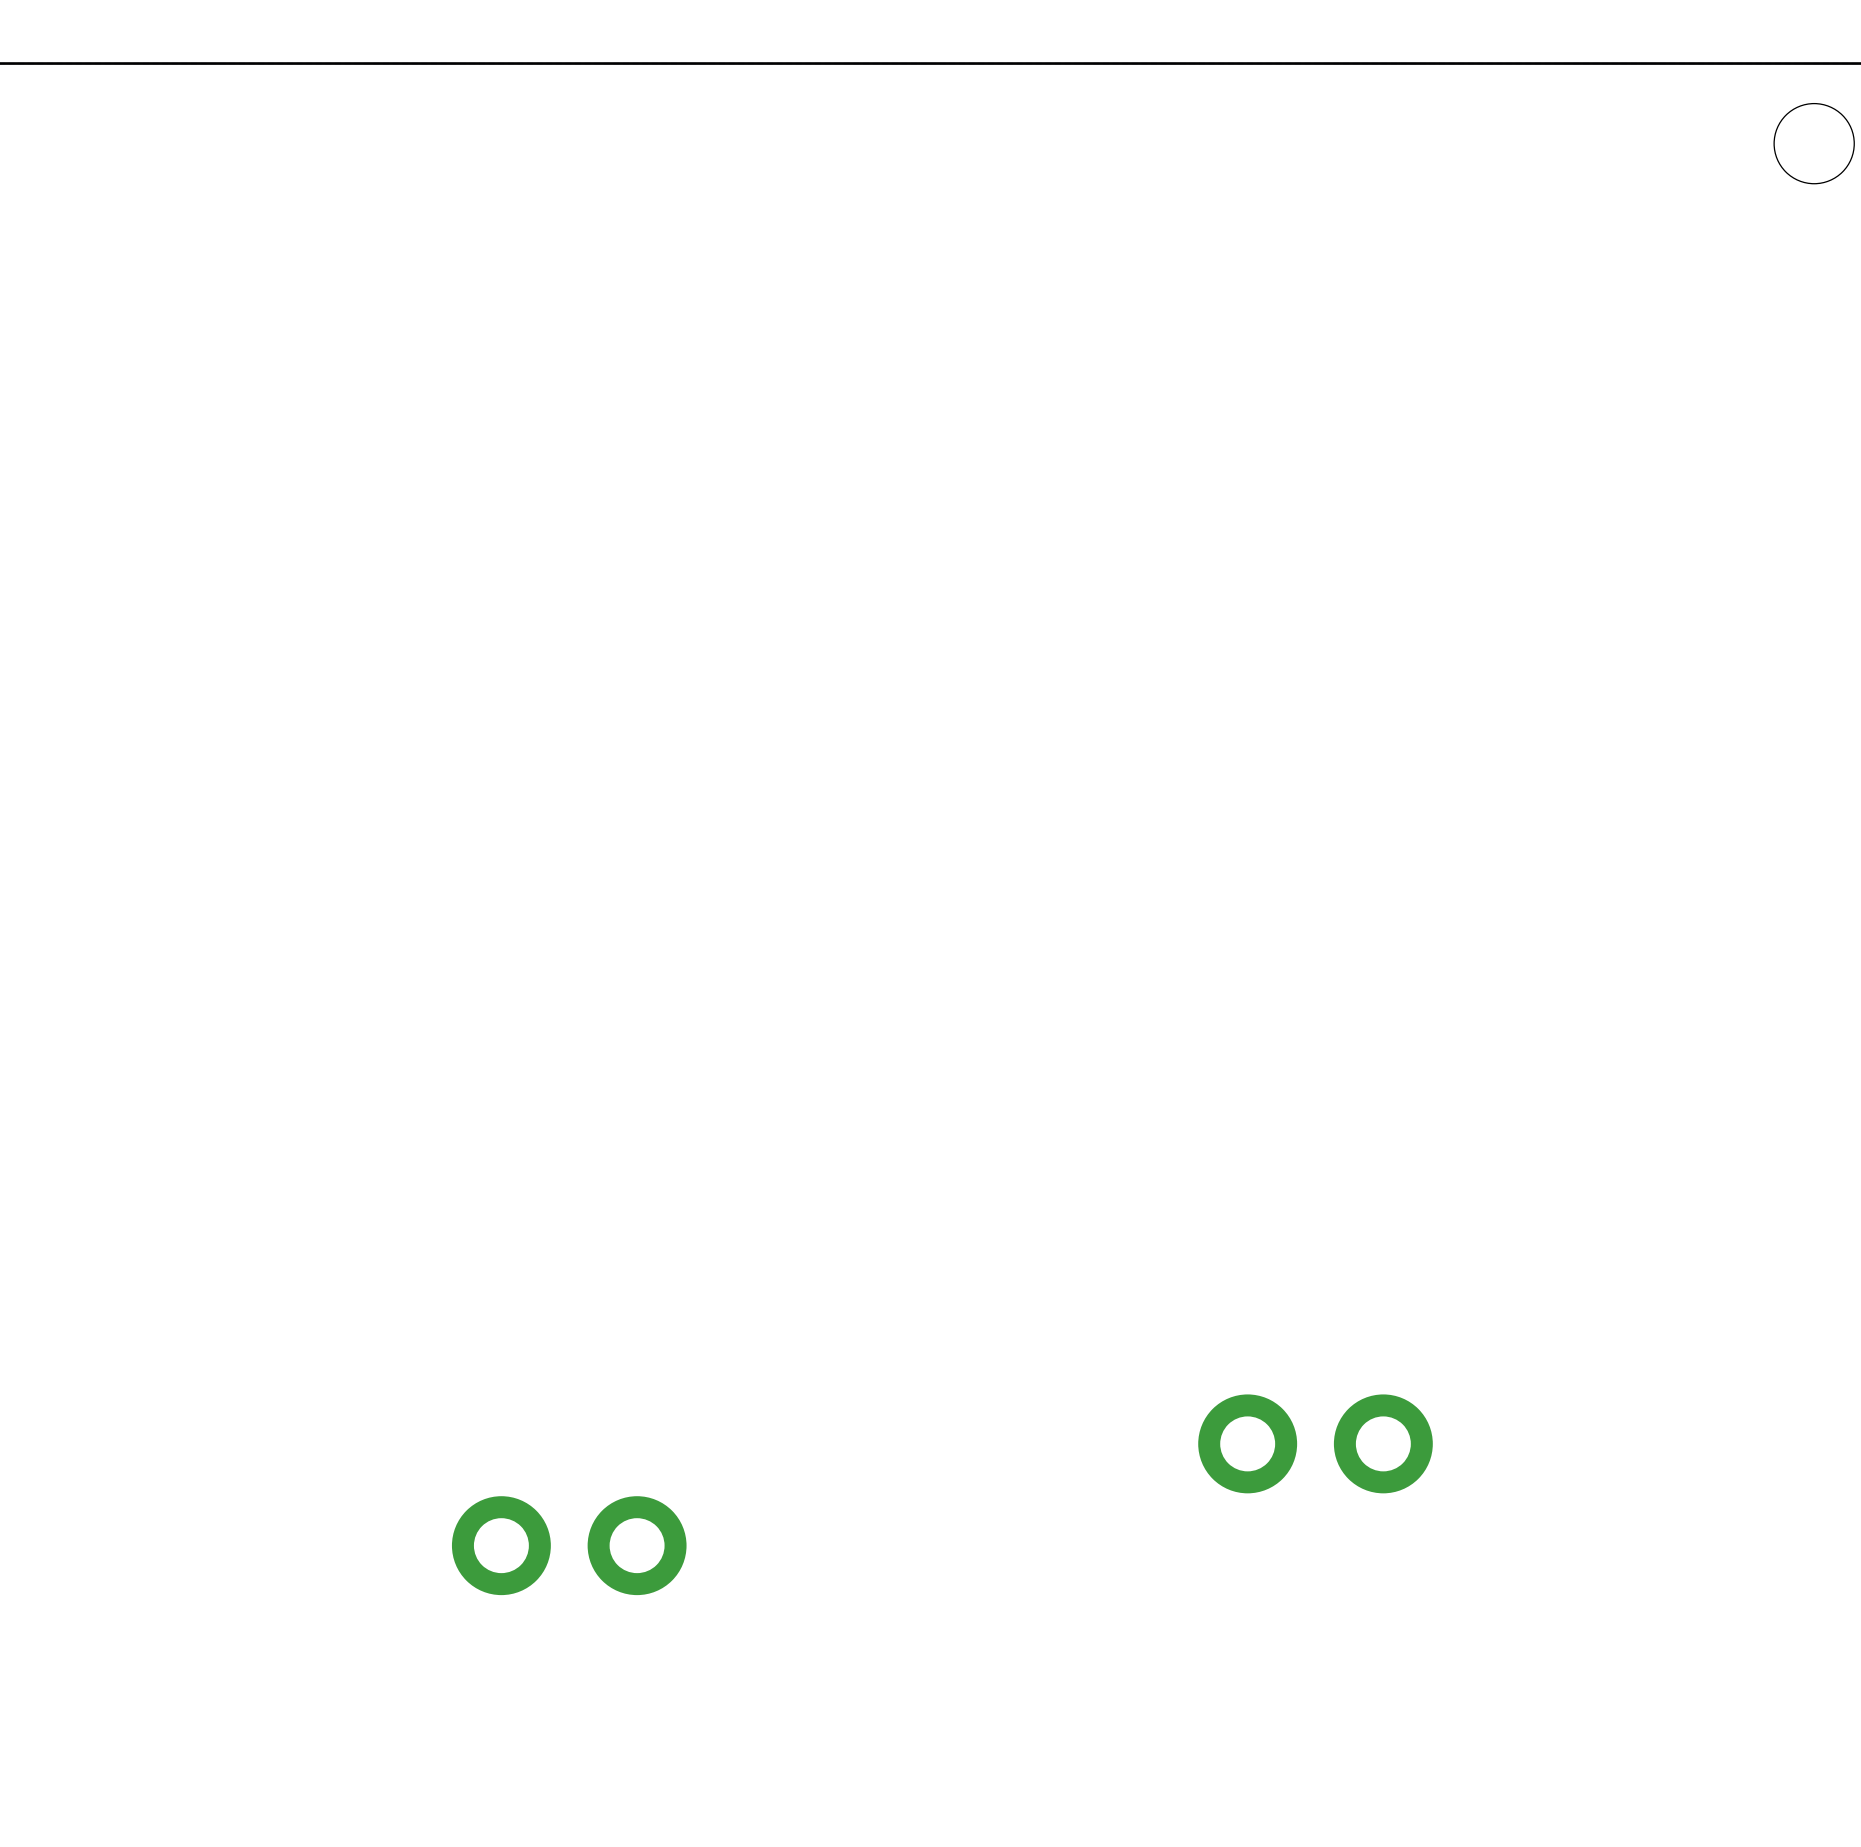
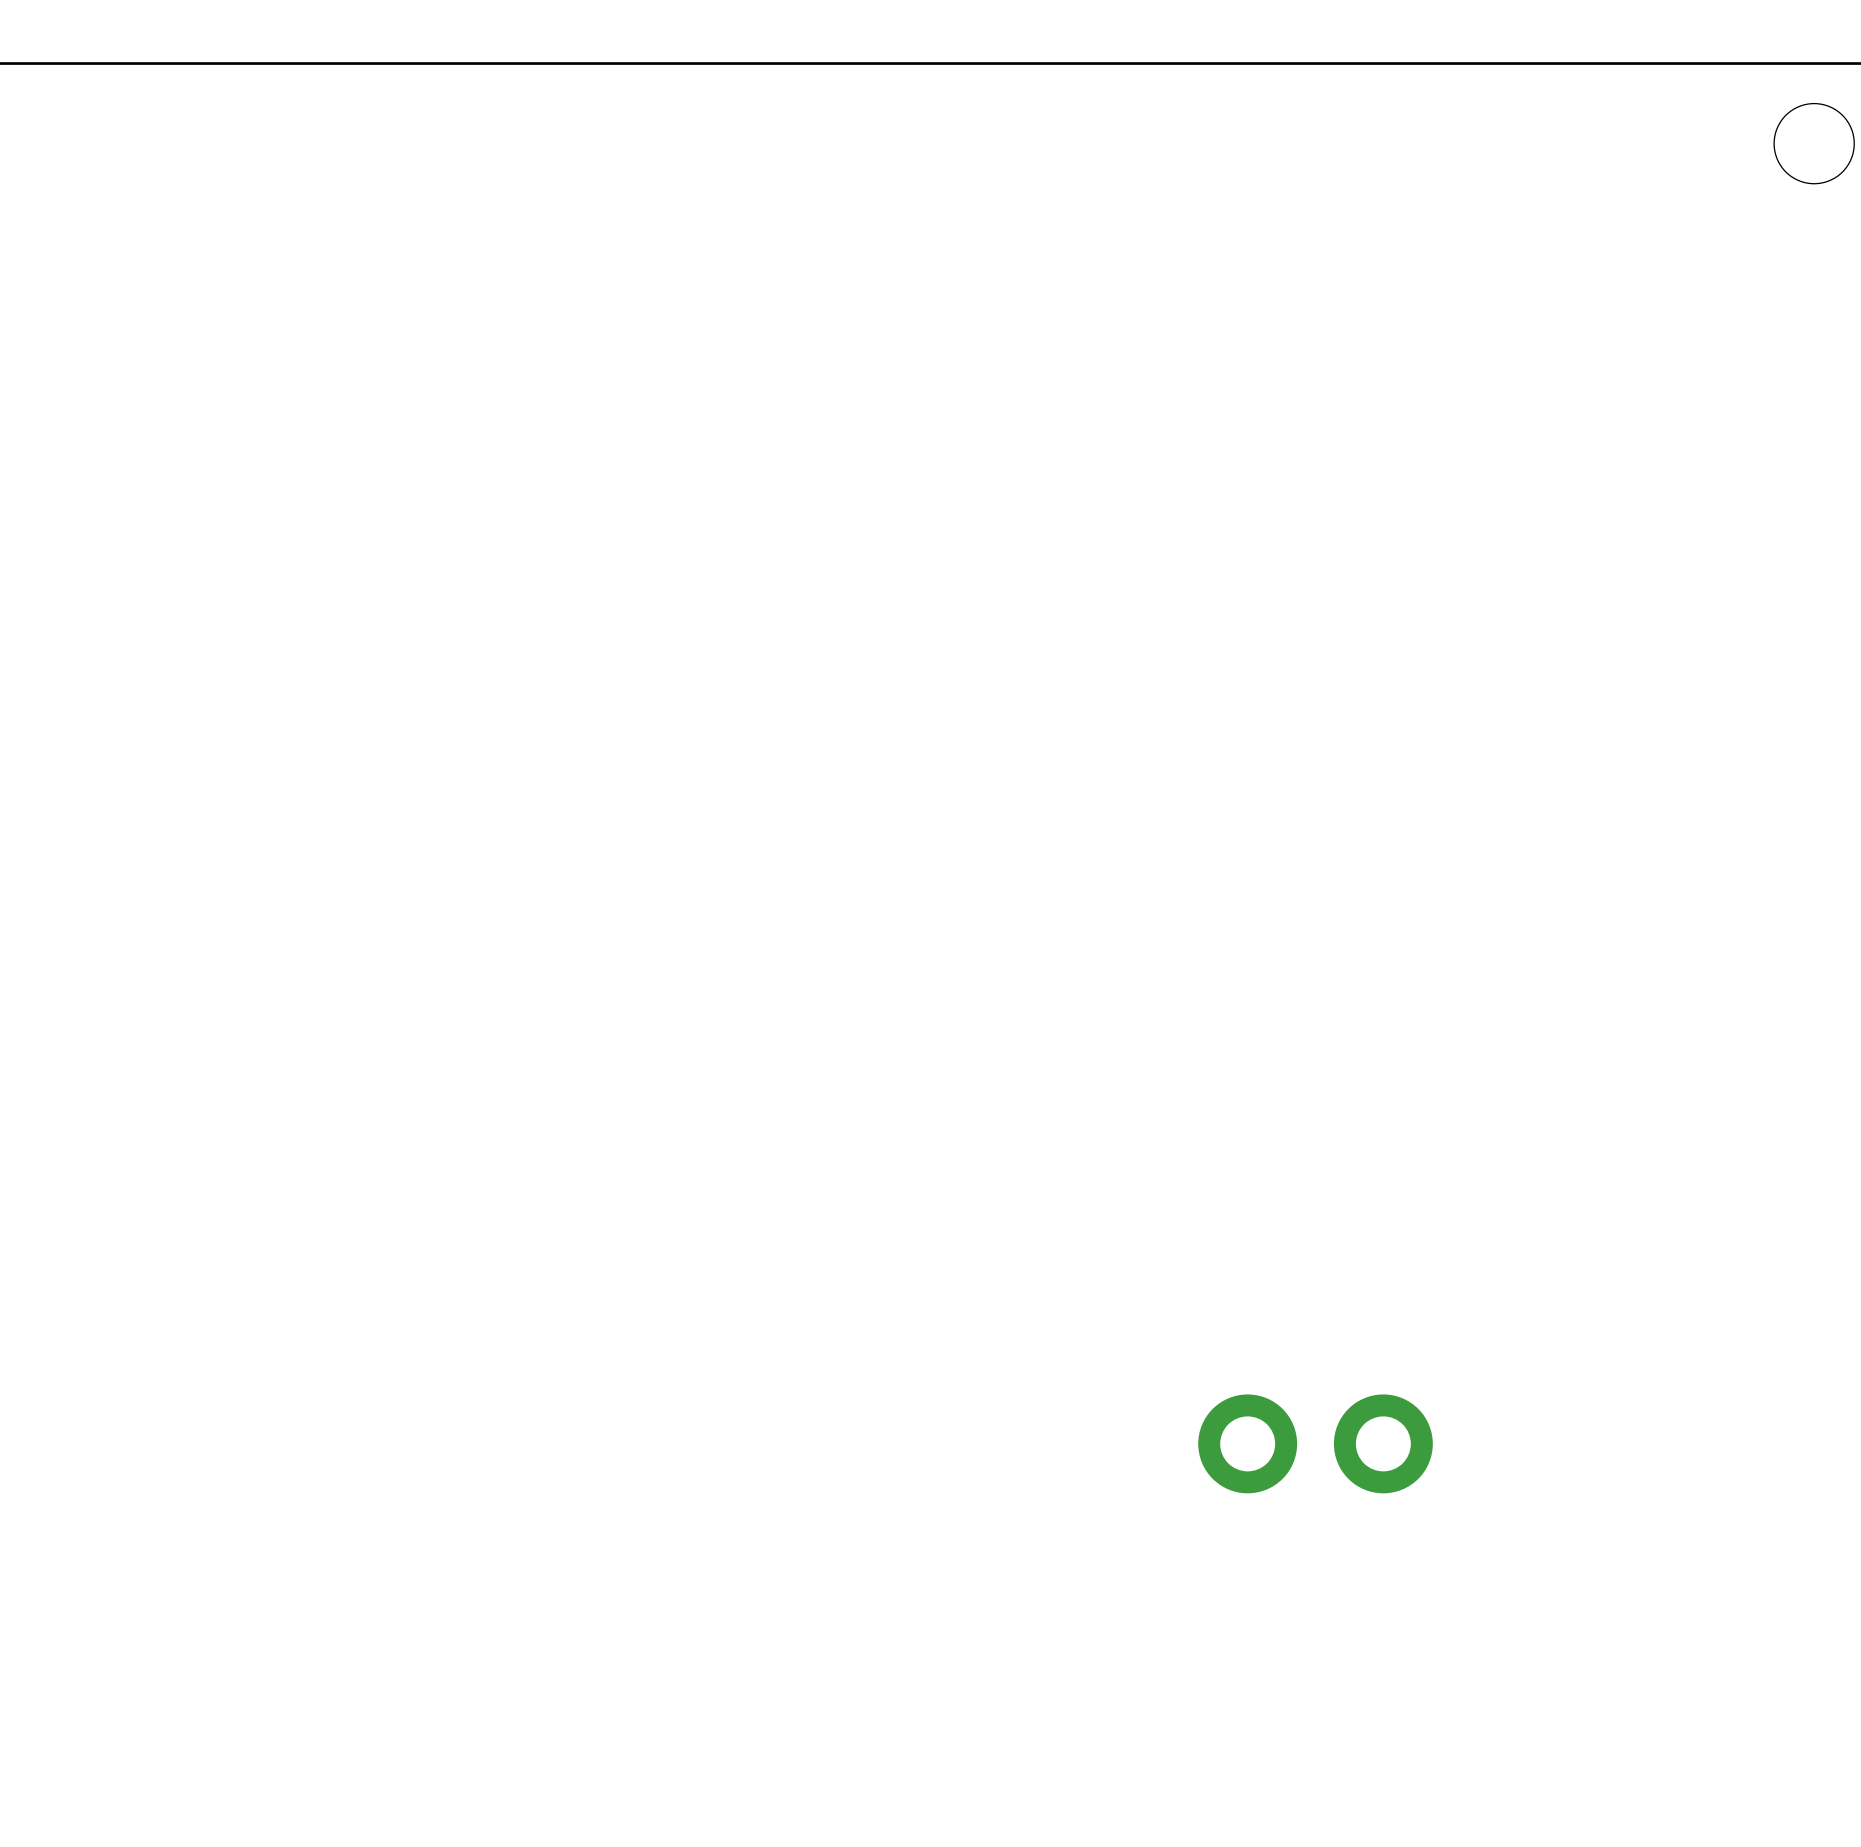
part: (569, 1545) -> none

